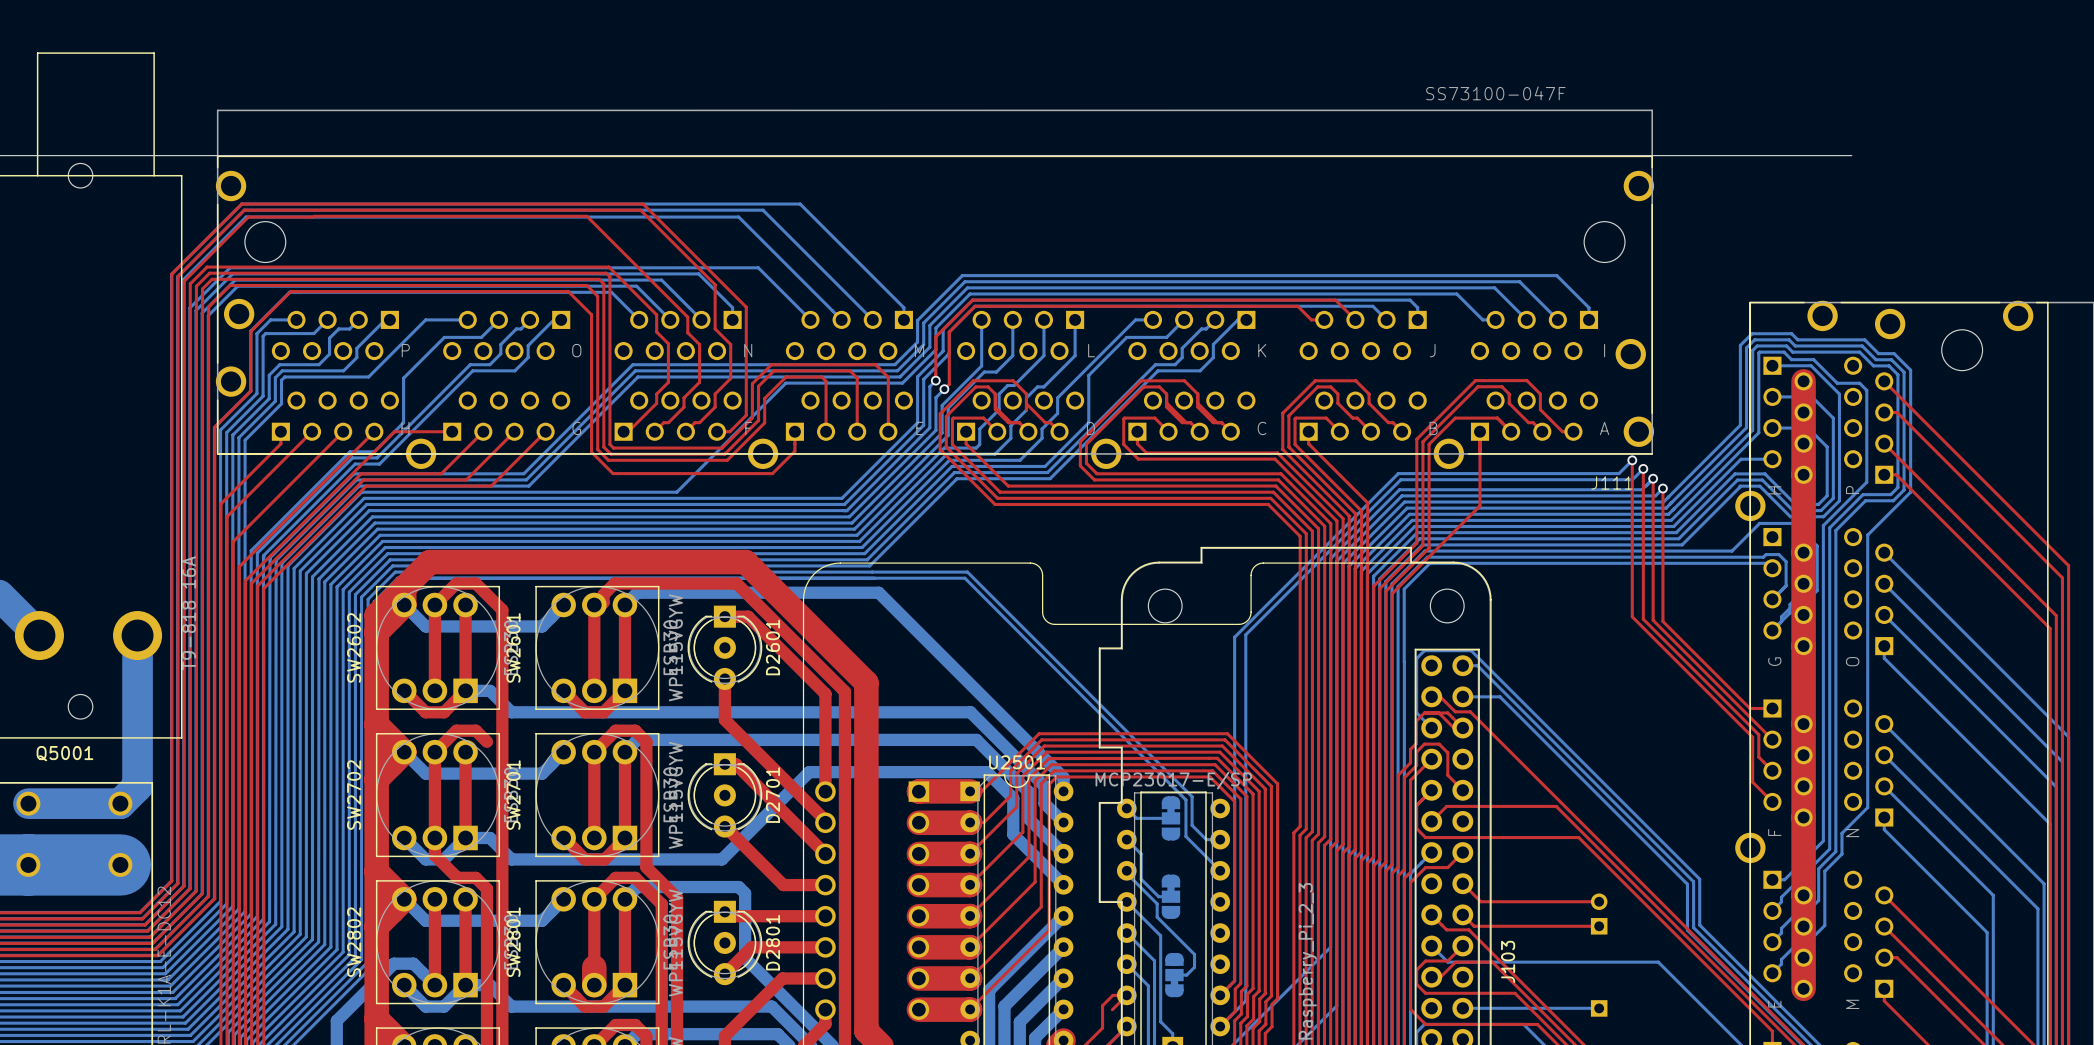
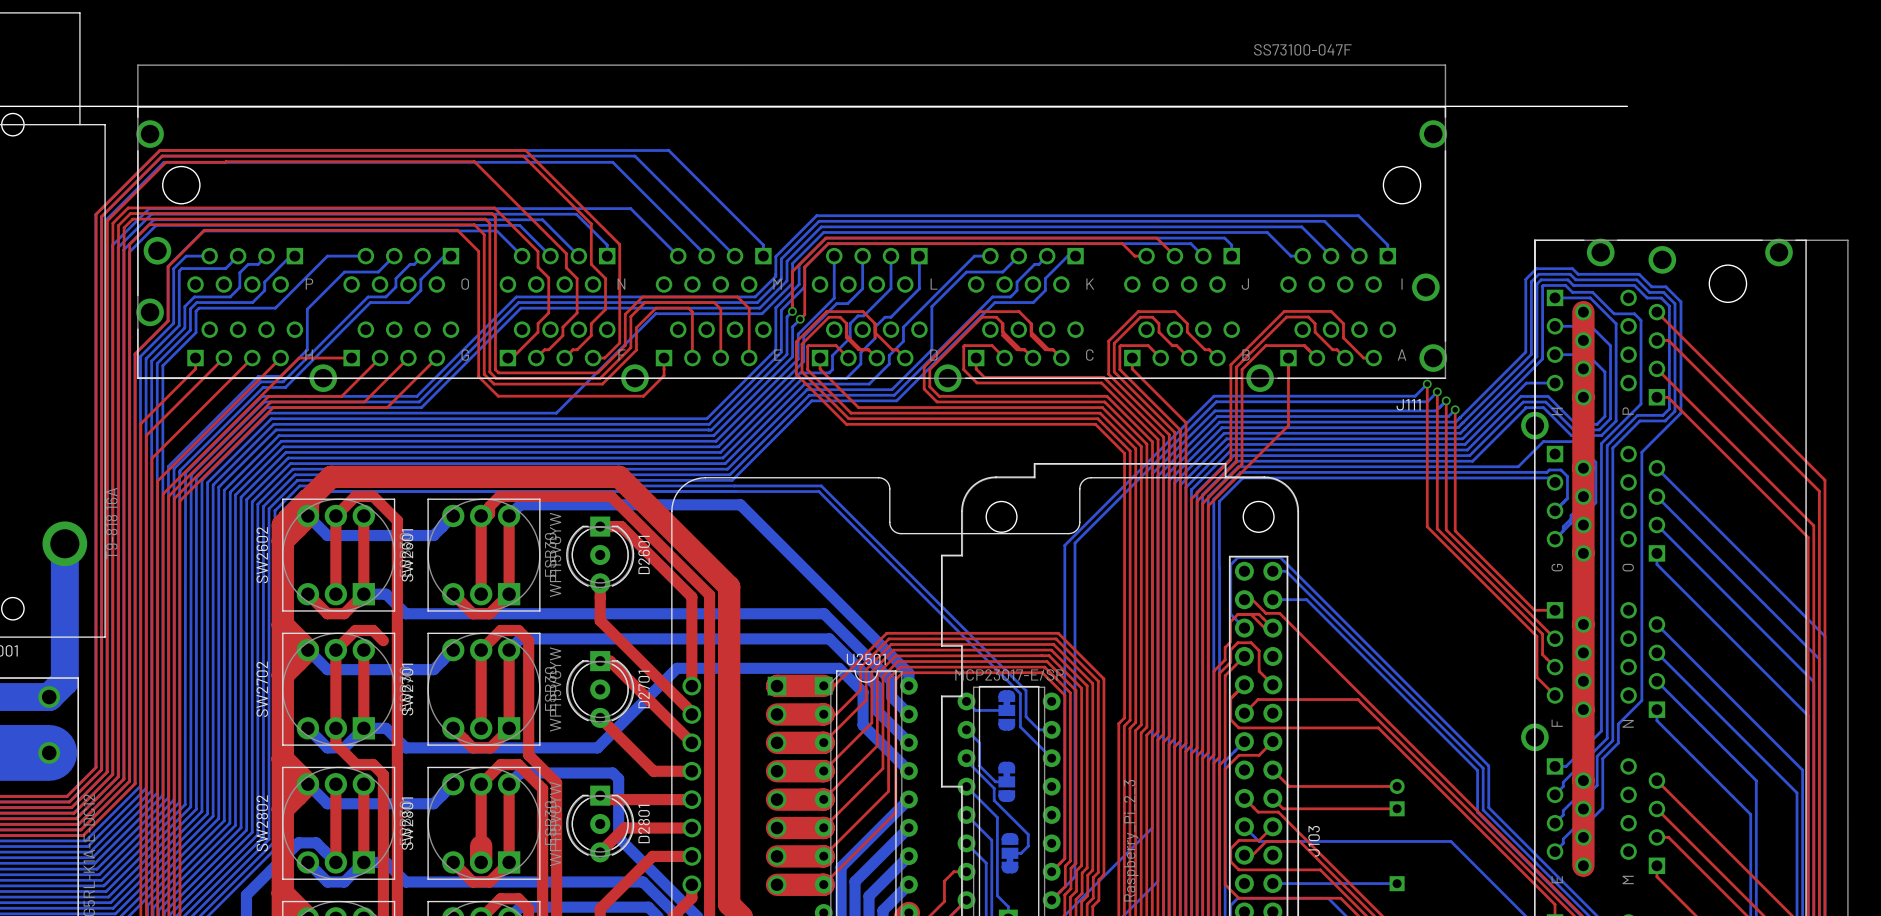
top track: (1126, 995) (1112, 1009) -> none

